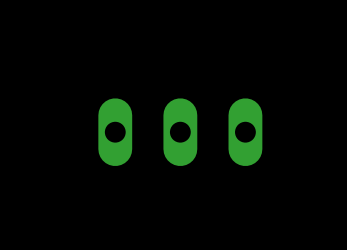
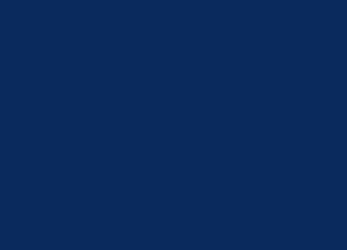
part: (180, 132) -> none

